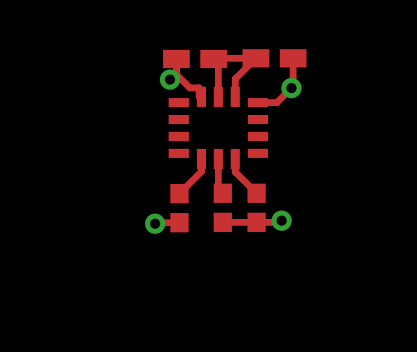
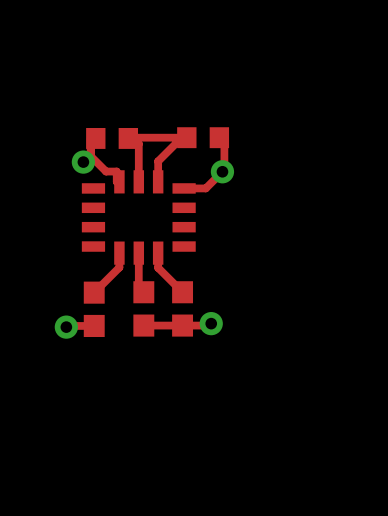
part footprint: [163, 49, 227, 69] -> [86, 128, 139, 149]
part footprint: [242, 49, 307, 68] -> [177, 127, 230, 149]

